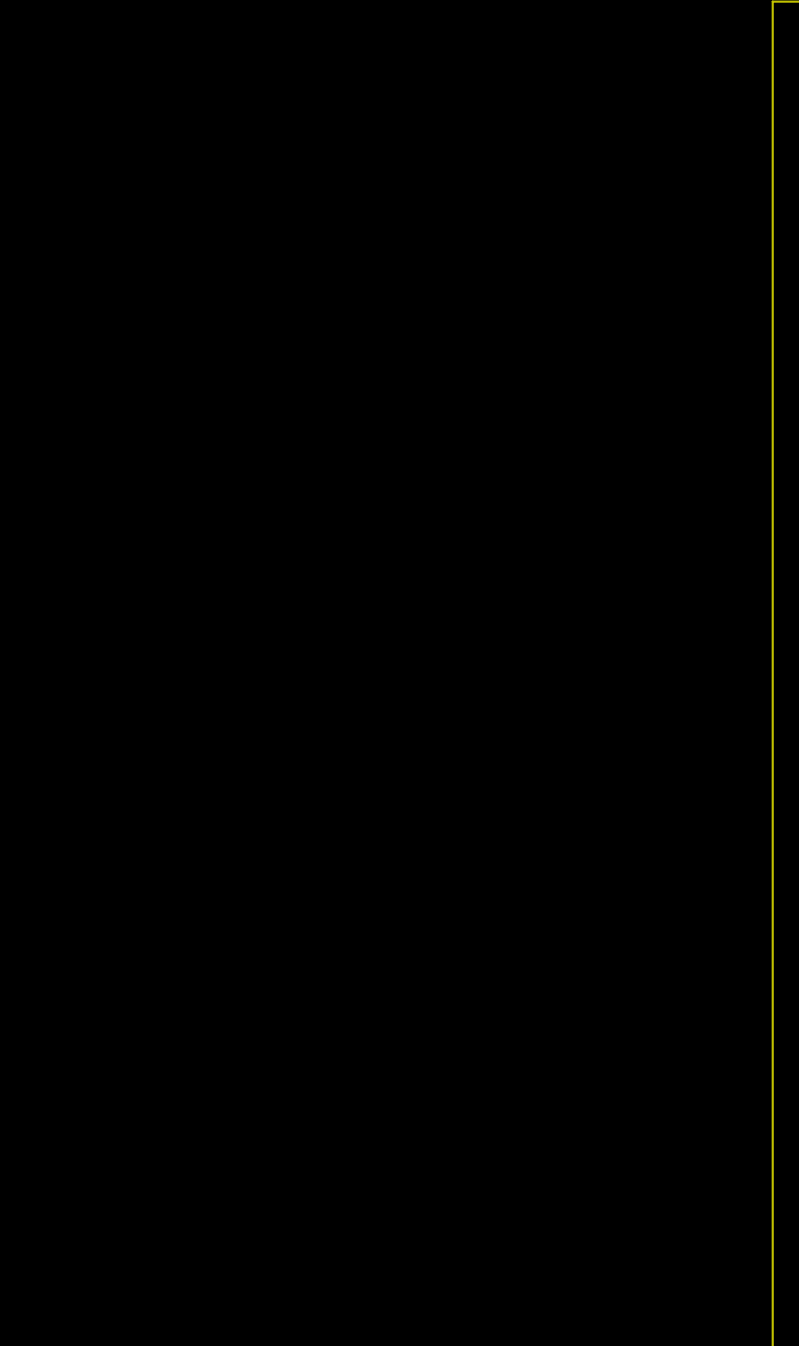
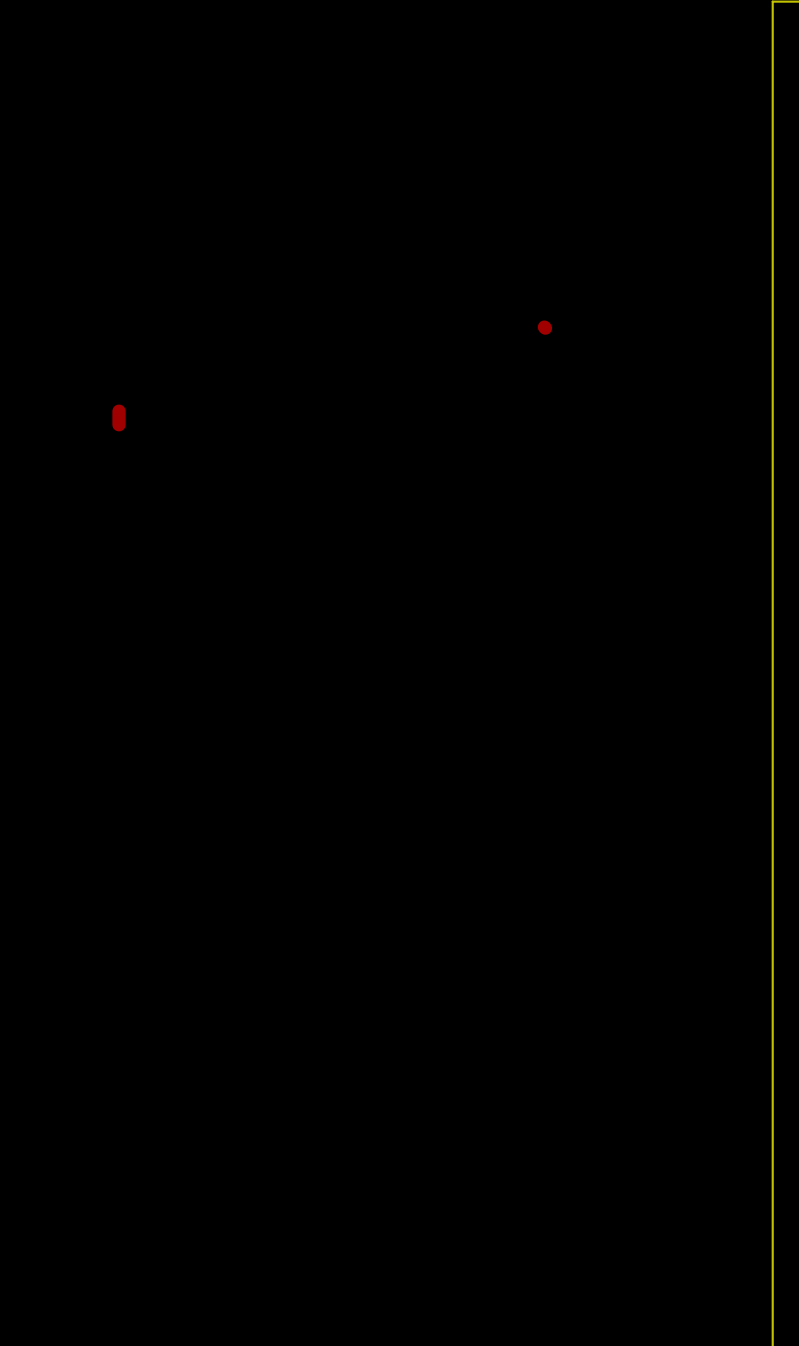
top track: none -> (544, 327) (545, 328)
top track: none -> (119, 411) (119, 424)

